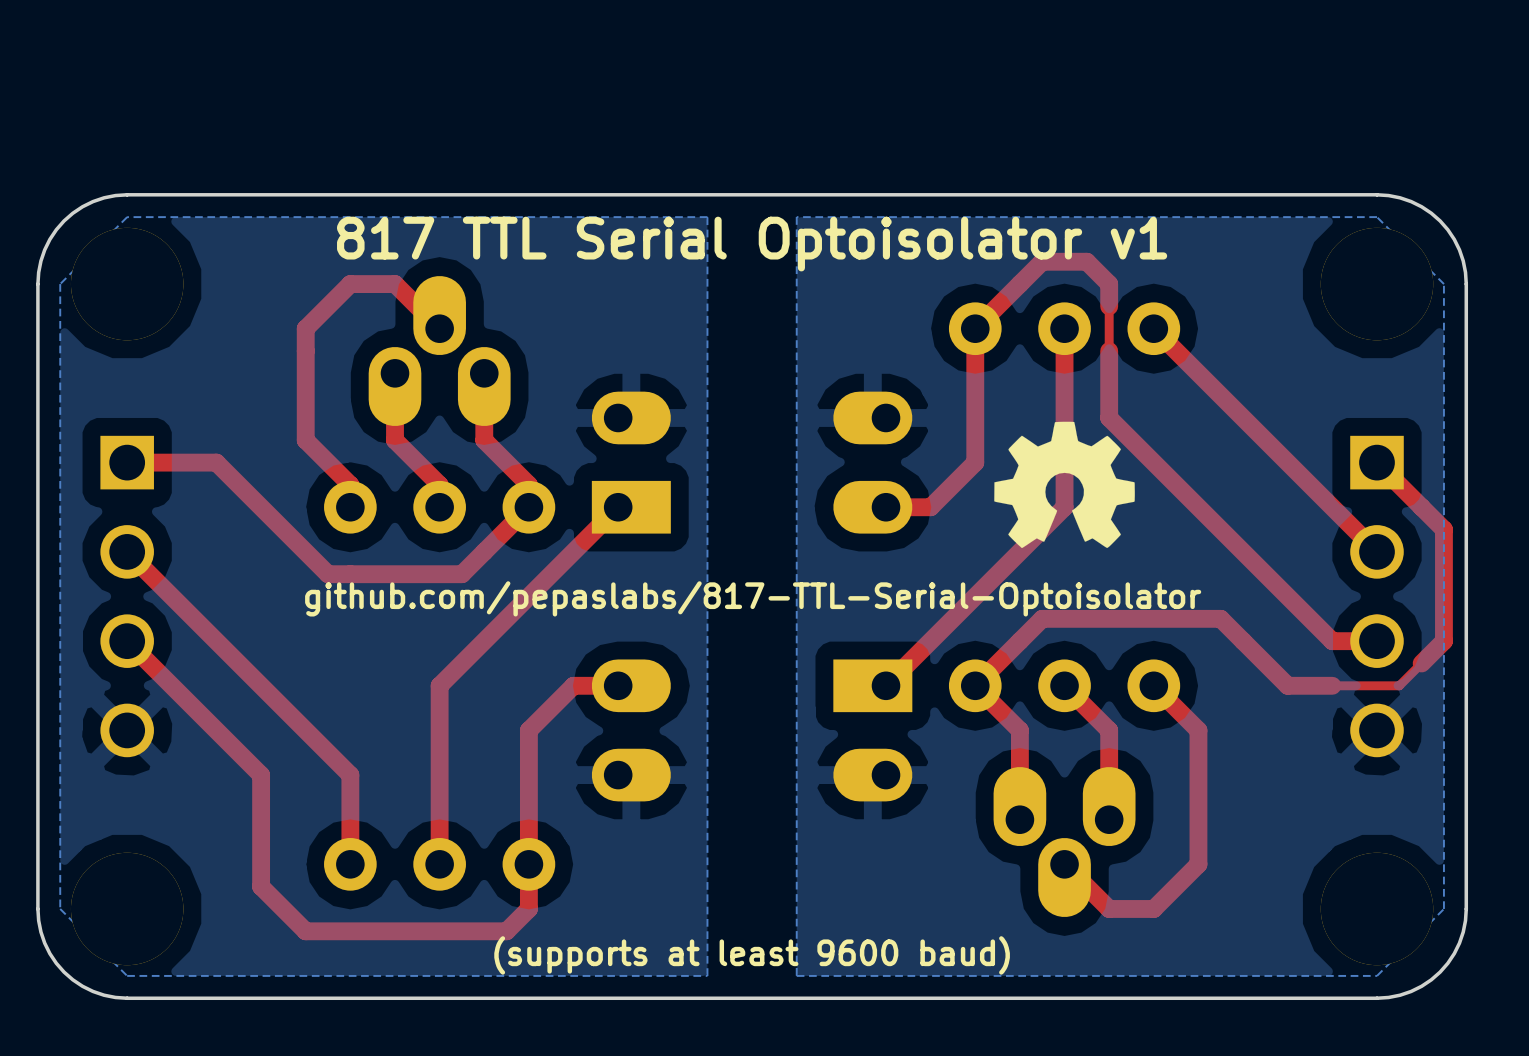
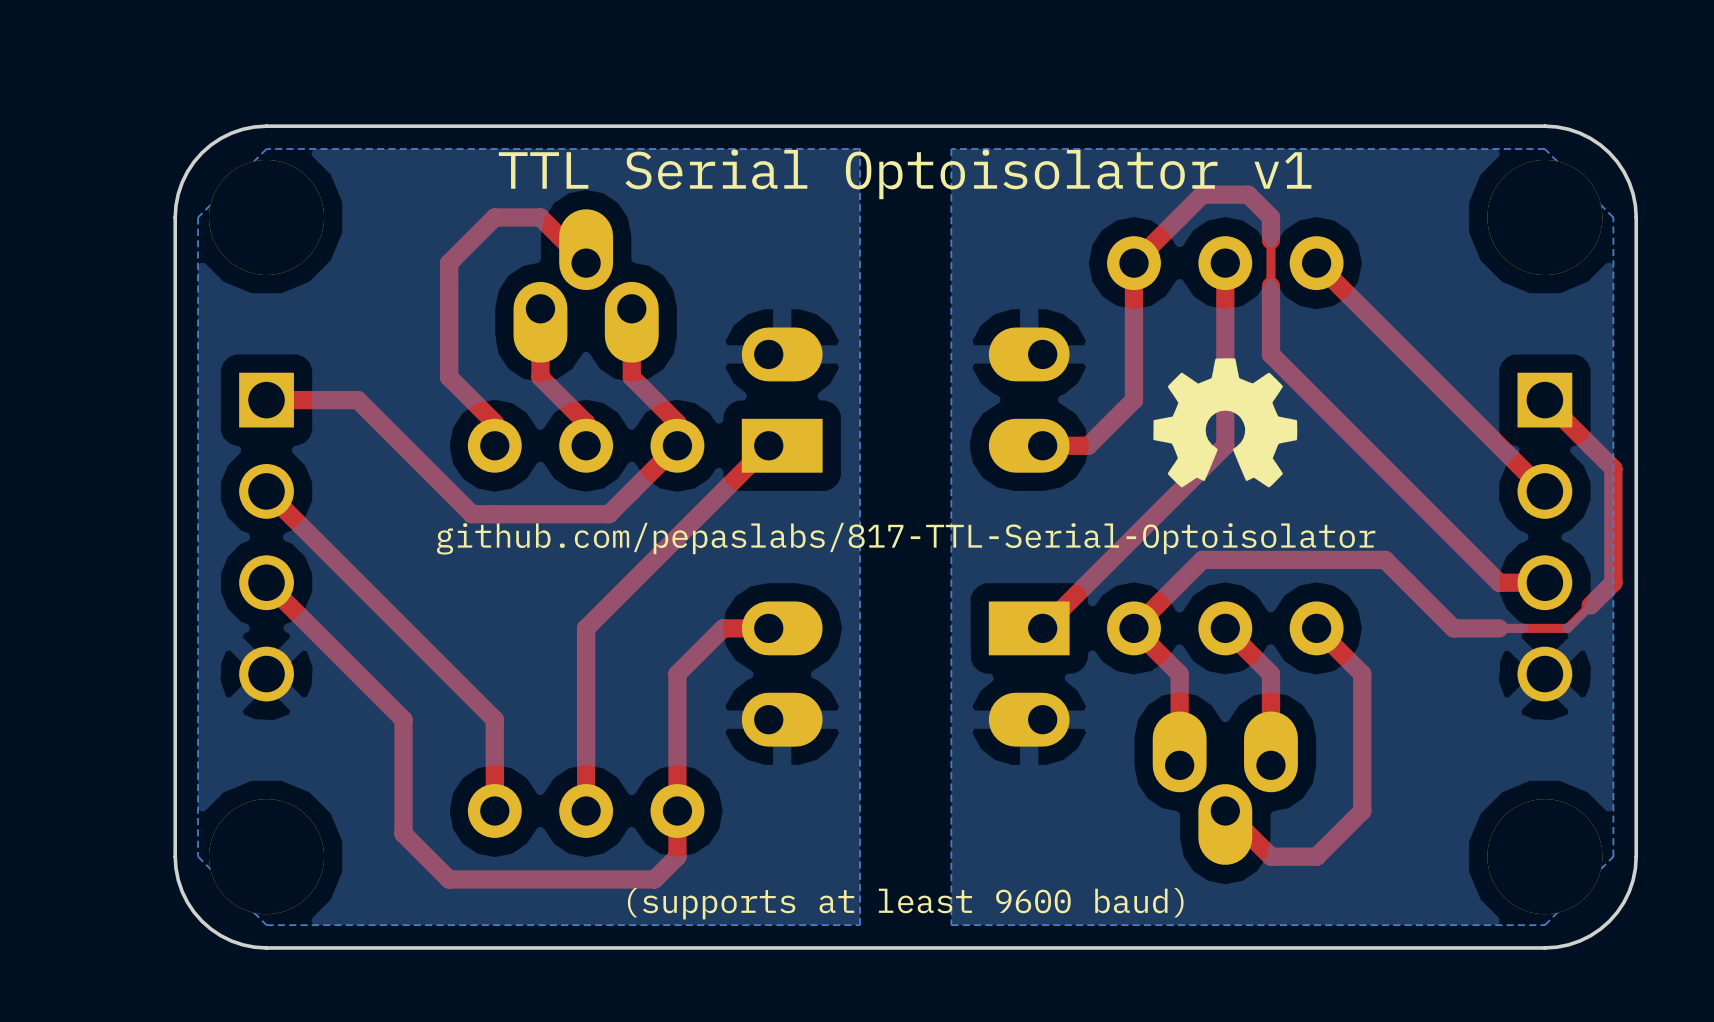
text: 817 TTL Serial Optoisolator v1 (752, 244) -> TTL Serial Optoisolator v1 (905, 174)

